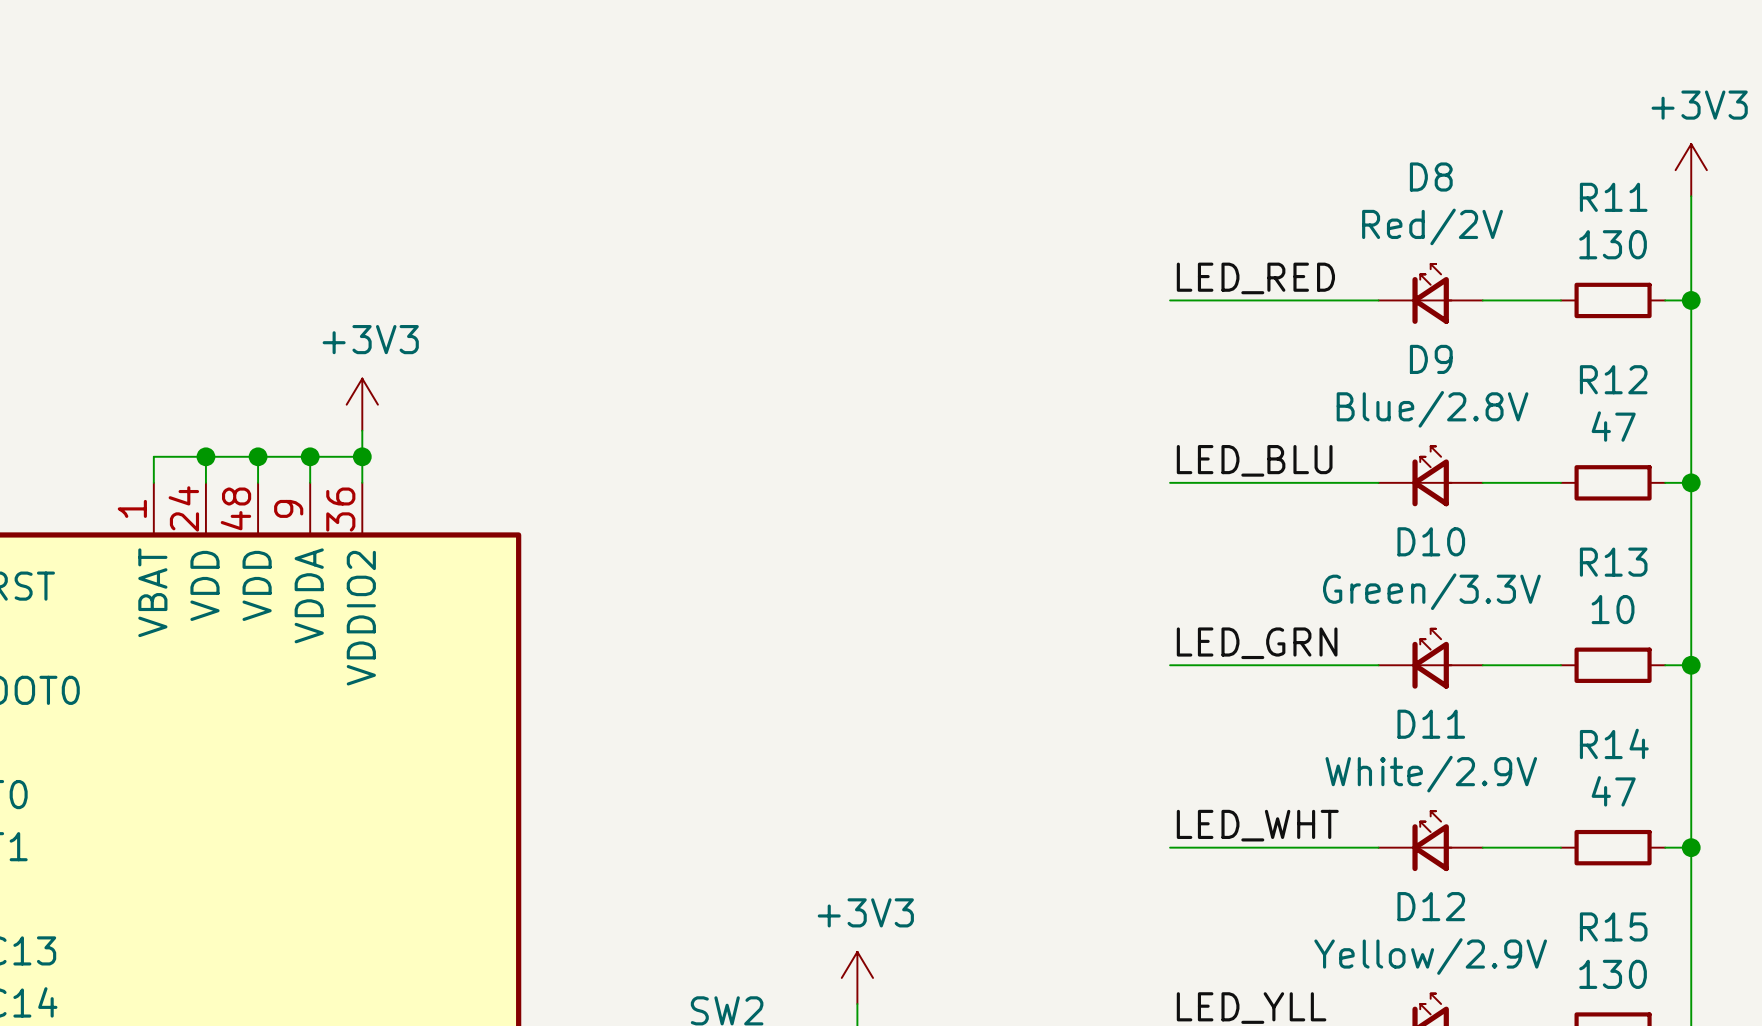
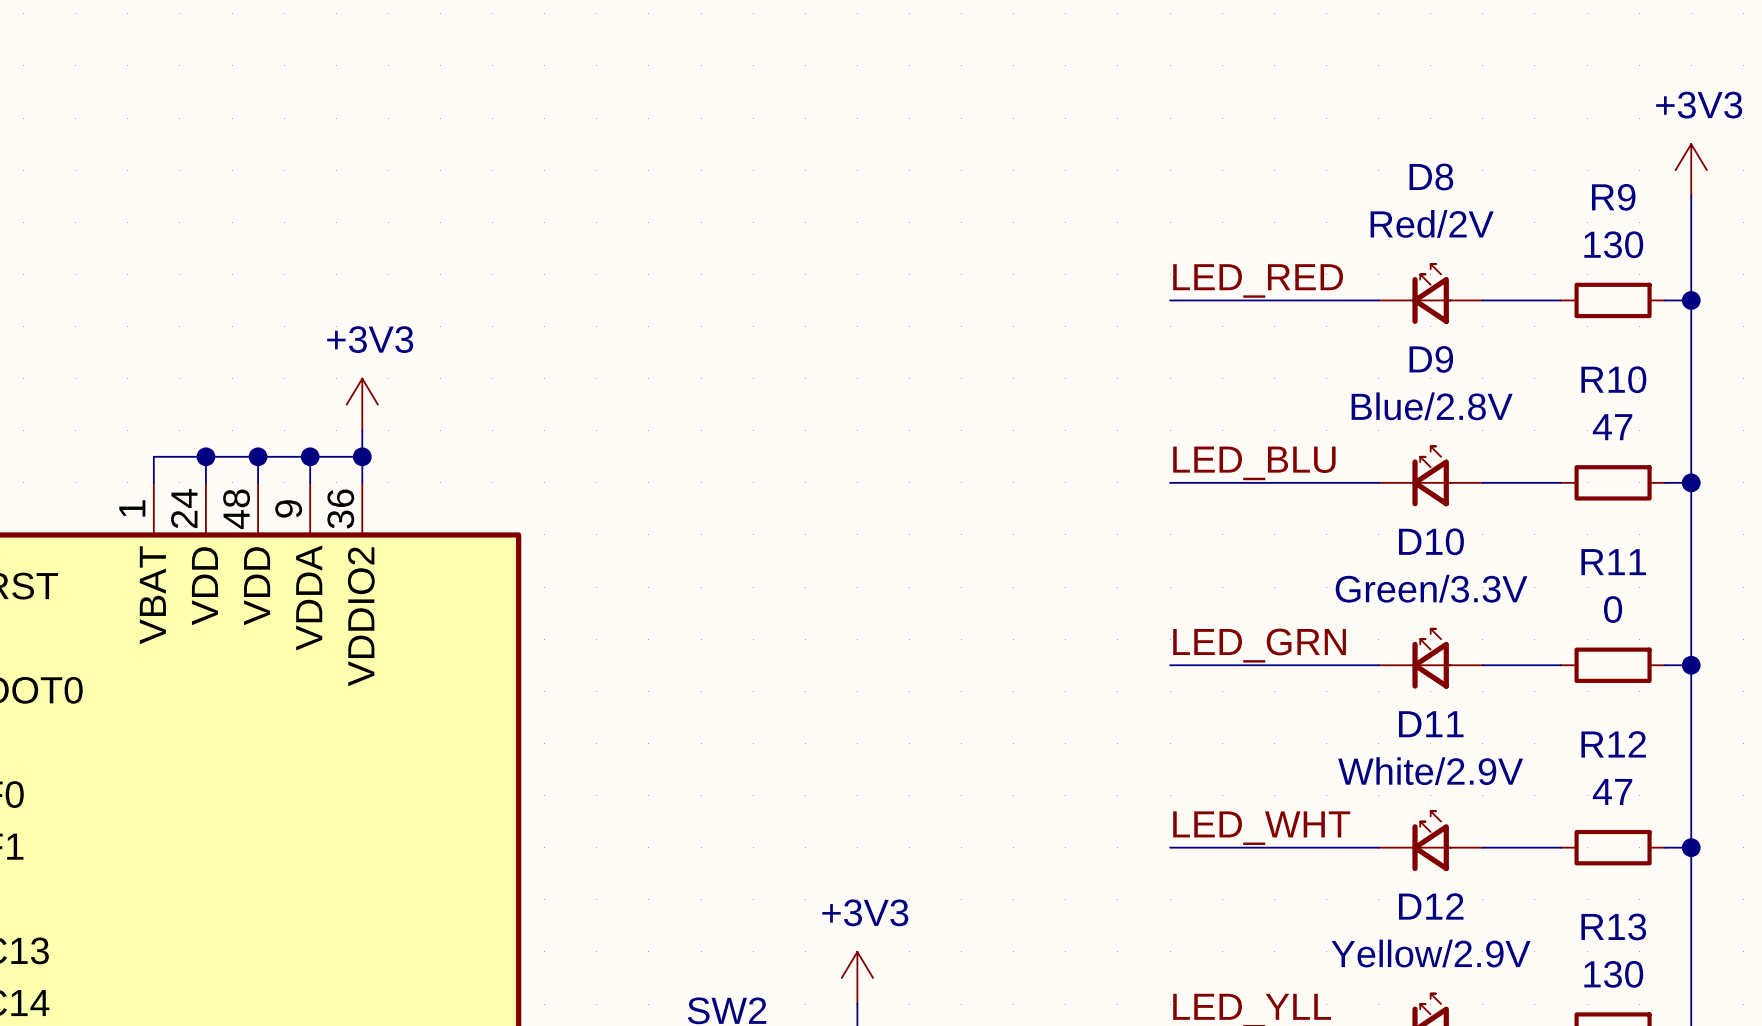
R11 name: R11 (1613, 197) -> R9 (1613, 197)
R12 name: R12 (1613, 379) -> R10 (1613, 379)
R13 name: R13 (1613, 562) -> R11 (1613, 562)
R13 value: 10 (1613, 609) -> 0 (1613, 609)
R14 name: R14 (1614, 743) -> R12 (1613, 744)
R15 name: R15 (1613, 926) -> R13 (1613, 926)

